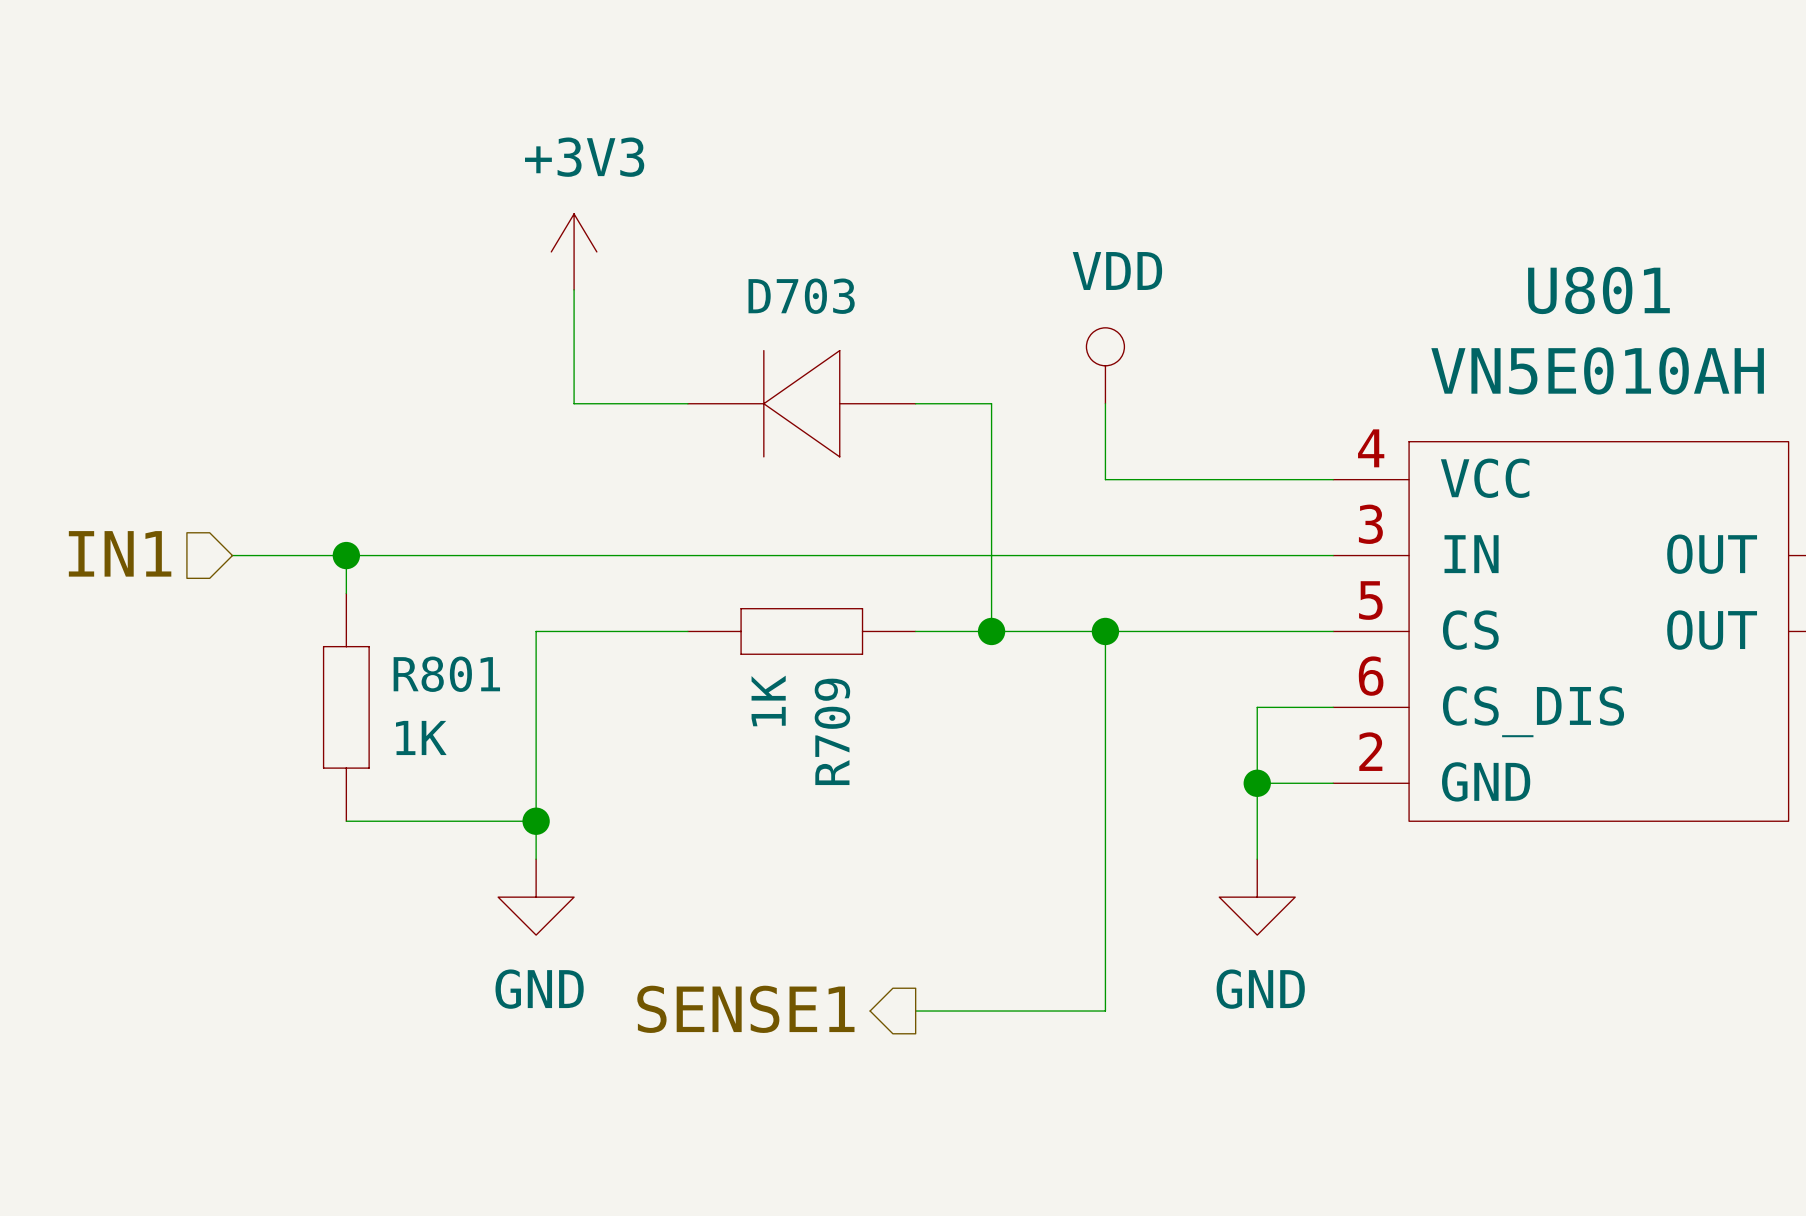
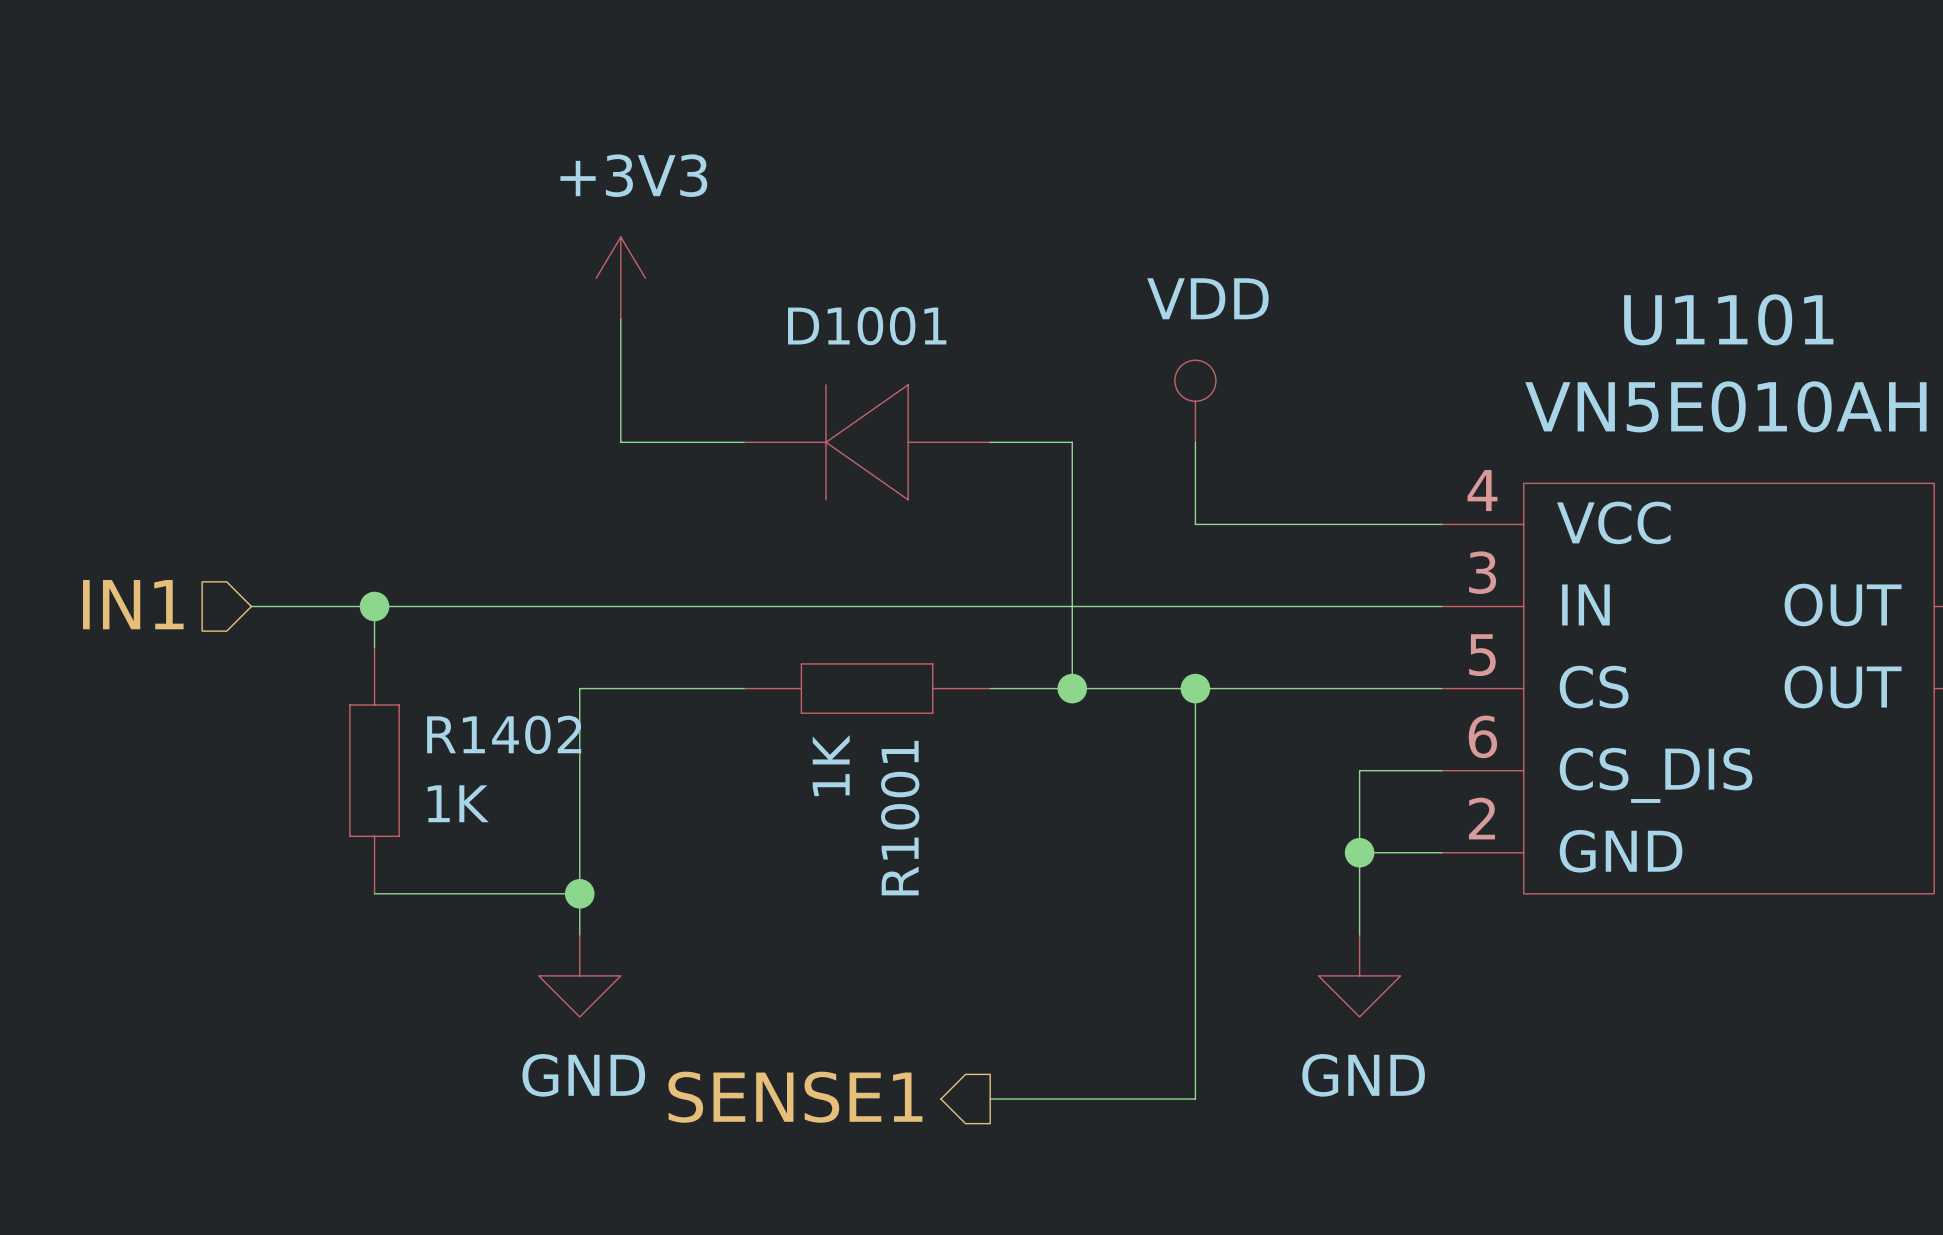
U801 name: U801 (1598, 290) -> U1101 (1728, 319)
D703 name: D703 (801, 296) -> D1001 (867, 326)
R801 name: R801 (446, 674) -> R1402 (504, 734)
R709 name: R709 (832, 731) -> R1001 (900, 818)

